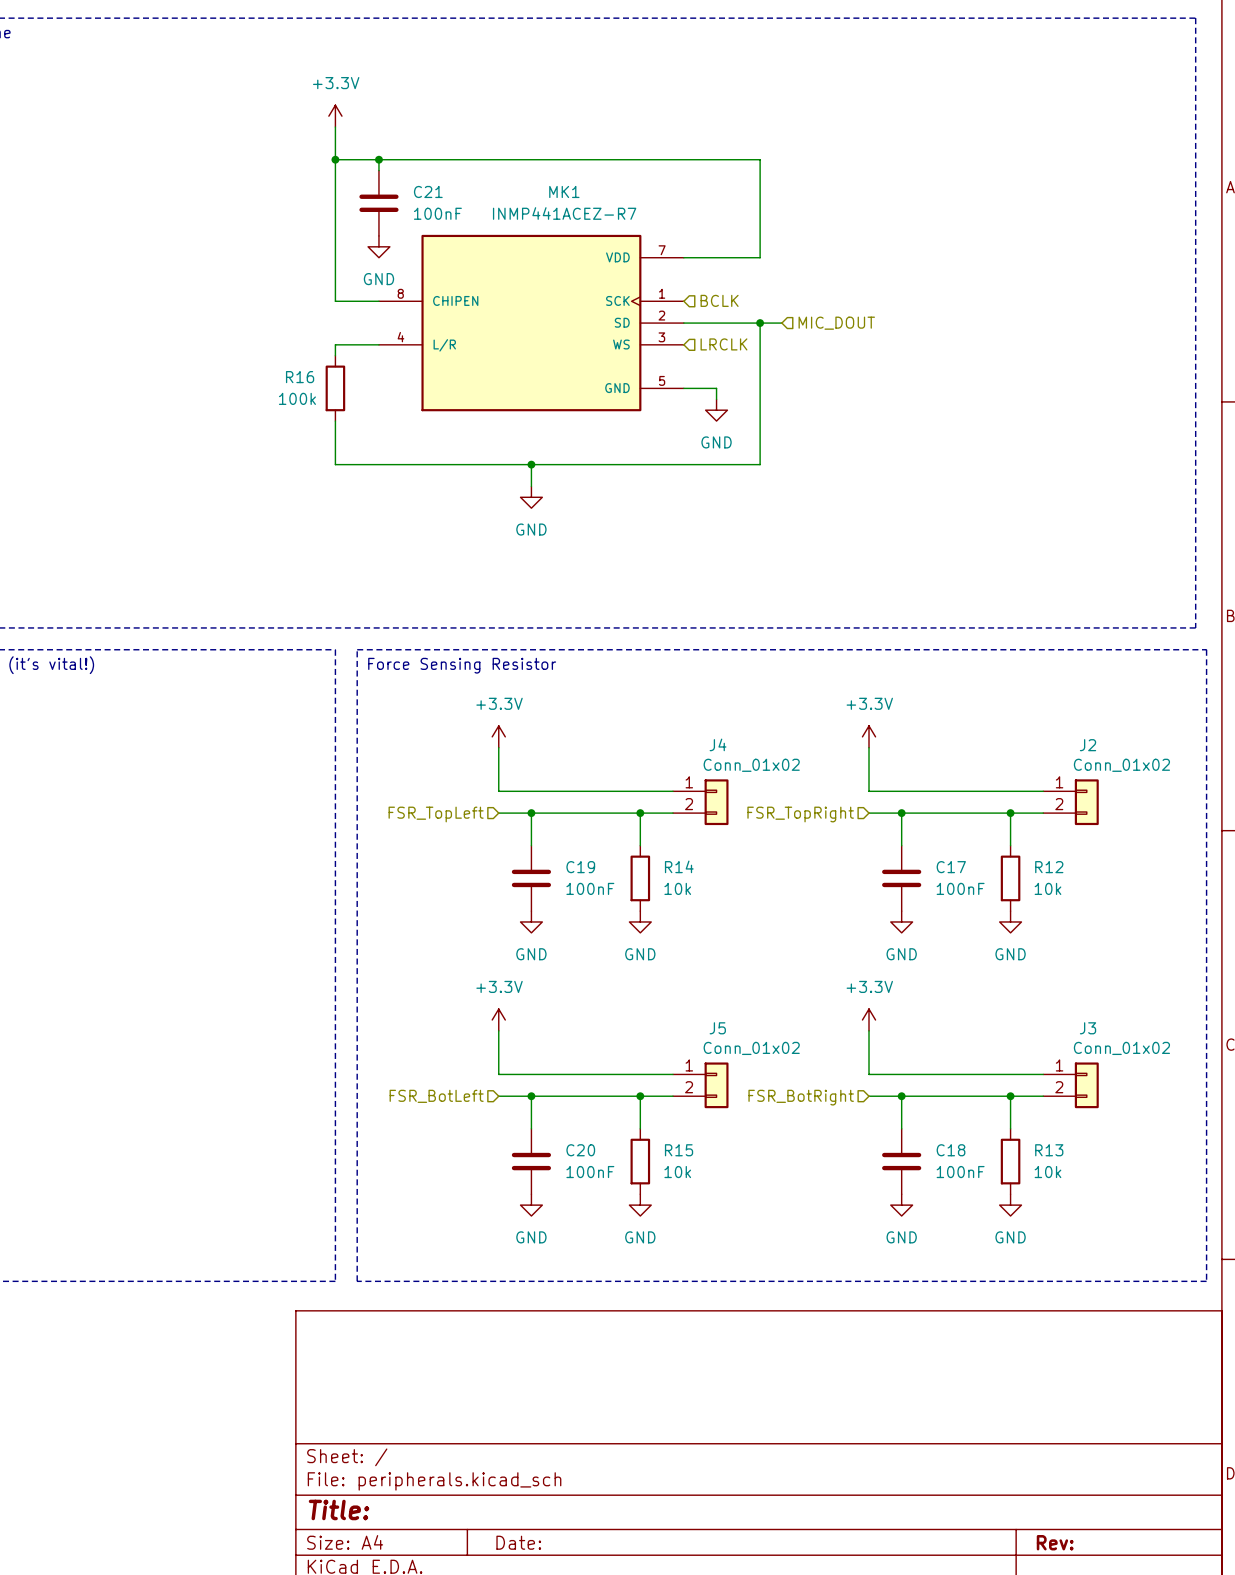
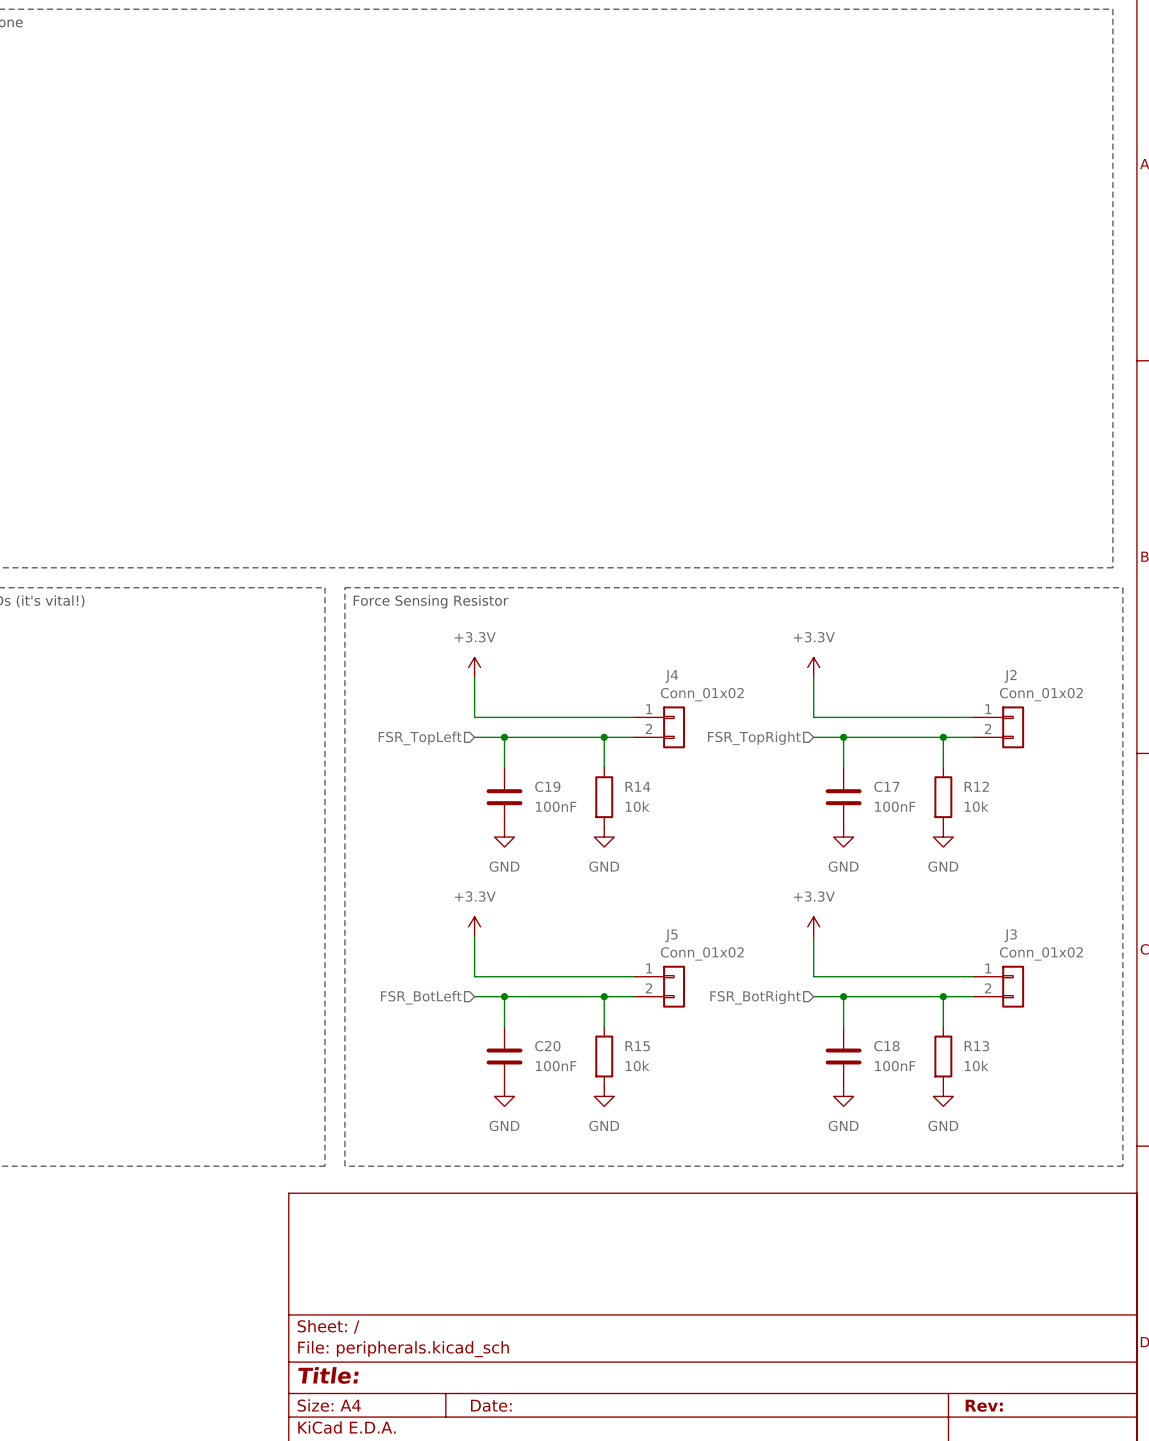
power symbol: +3.3V (335, 116) -> none
wire: (335, 127) (335, 301) (378, 301) -> none
wire: (335, 159) (760, 159) (760, 257) (683, 257) -> none
junction: (335, 159) -> none
wire: (378, 159) (378, 170) -> none
junction: (378, 159) -> none
C21: 100nF (378, 203) -> none
power symbol: GND (378, 246) -> none
hierarchical label: BCLK (719, 300) -> none
MK1: INMP441ACEZ-R7 (531, 323) -> none
wire: (683, 323) (781, 323) -> none
wire: (760, 323) (760, 464) (335, 464) (335, 421) -> none
junction: (760, 323) -> none
hierarchical label: MIC_DOUT (836, 323) -> none
wire: (378, 344) (335, 344) (335, 355) -> none
hierarchical label: LRCLK (723, 344) -> none
R16: 100k (335, 388) -> none
wire: (683, 388) (716, 388) (716, 399) -> none
power symbol: GND (716, 410) -> none
wire: (531, 464) (531, 486) -> none
junction: (531, 464) -> none
power symbol: GND (531, 497) -> none

